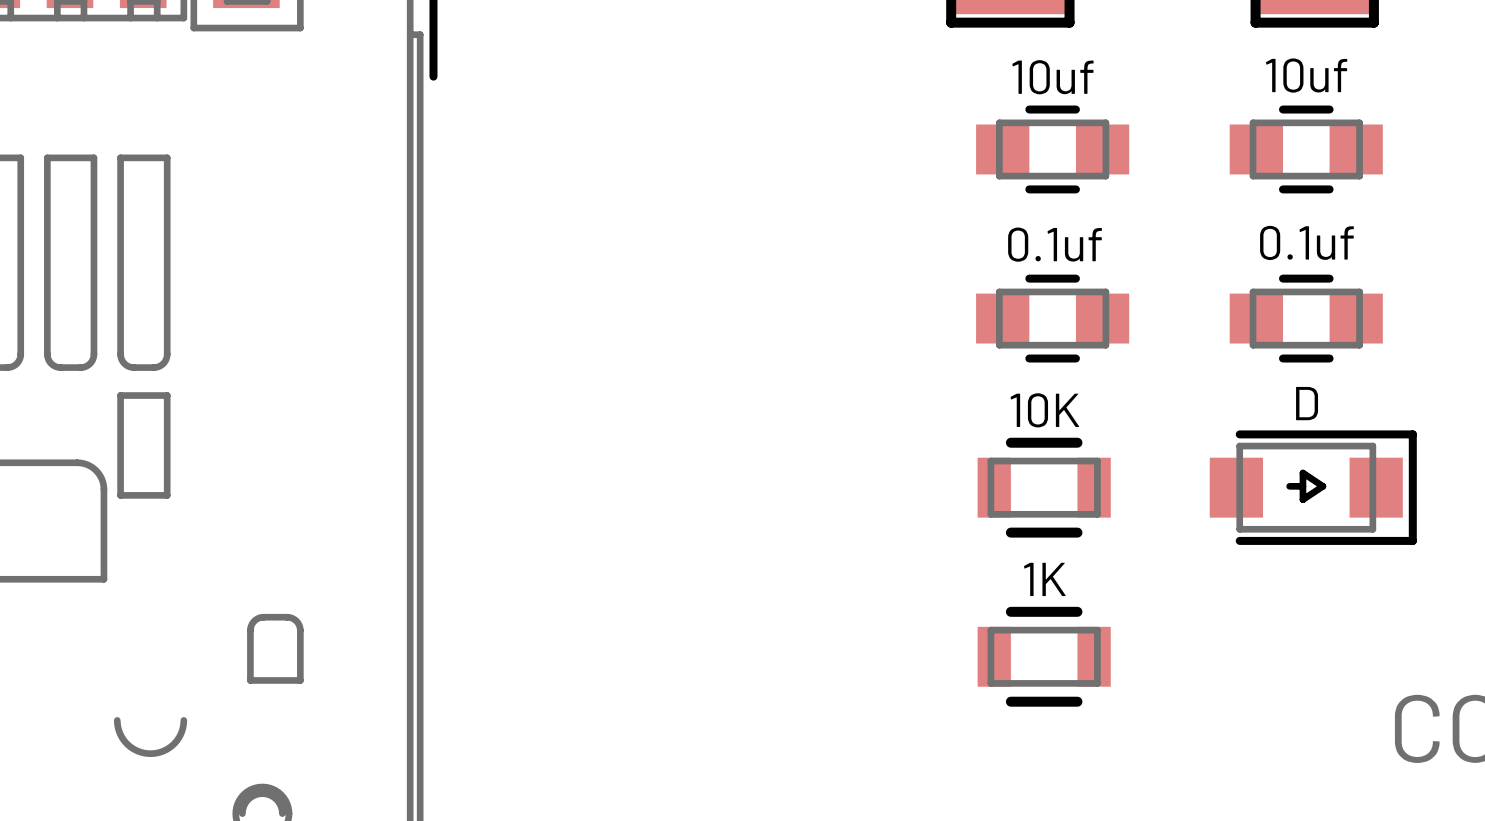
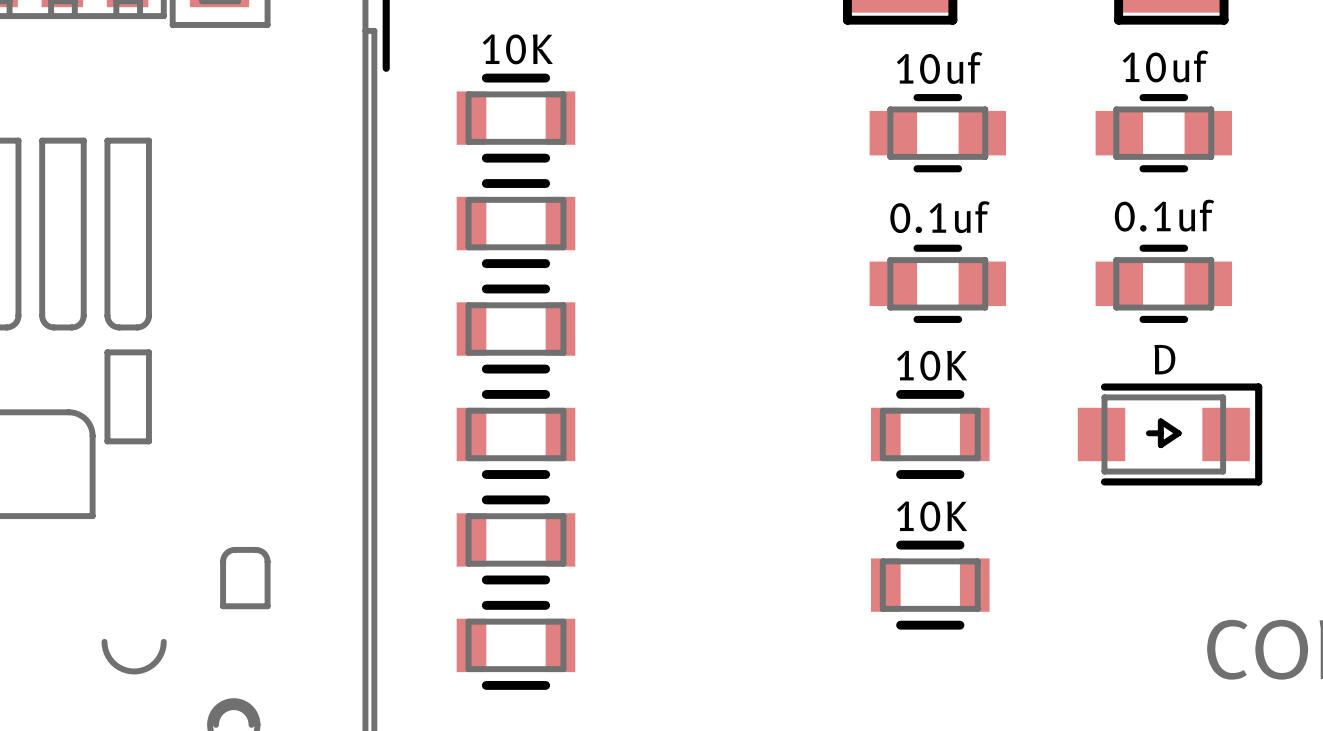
part: none -> 10K (515, 118)
part: none -> (515, 223)
part: none -> (515, 329)
part: none -> (515, 434)
part value: 1K (1044, 579) -> 10K (932, 516)
part: none -> (515, 539)
part: none -> (515, 645)

